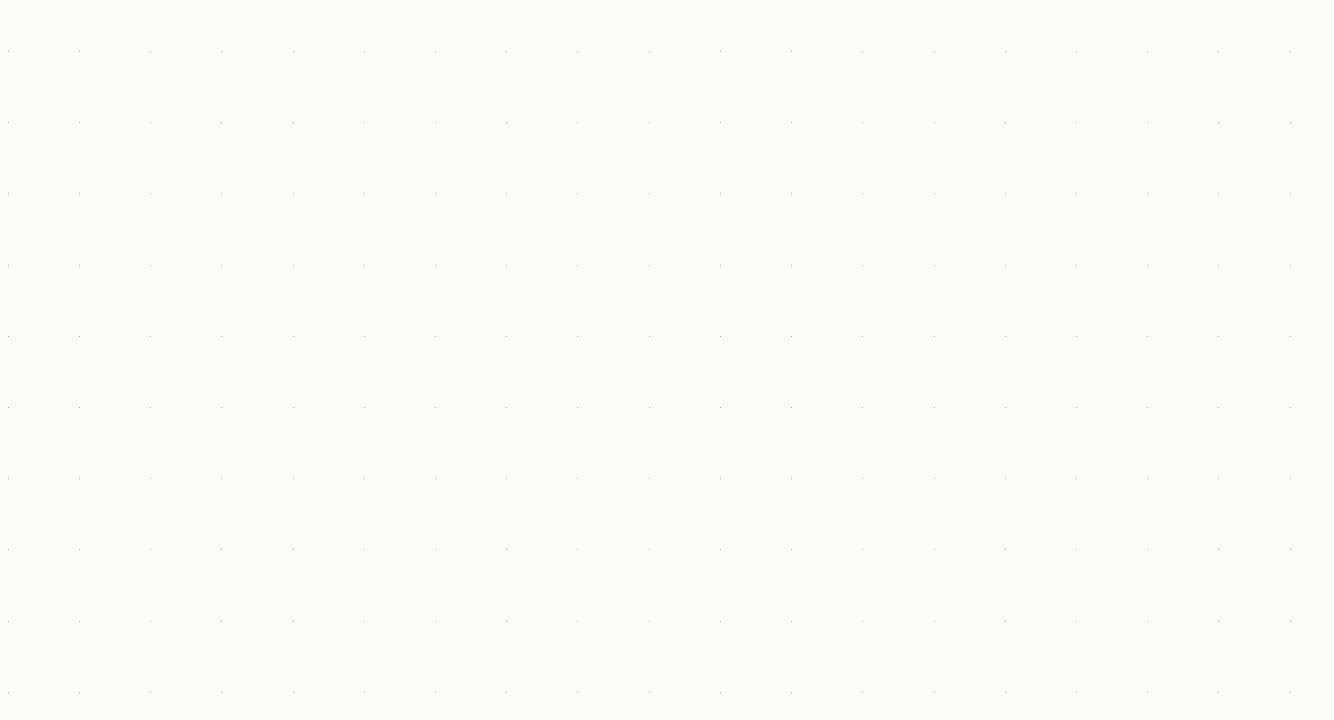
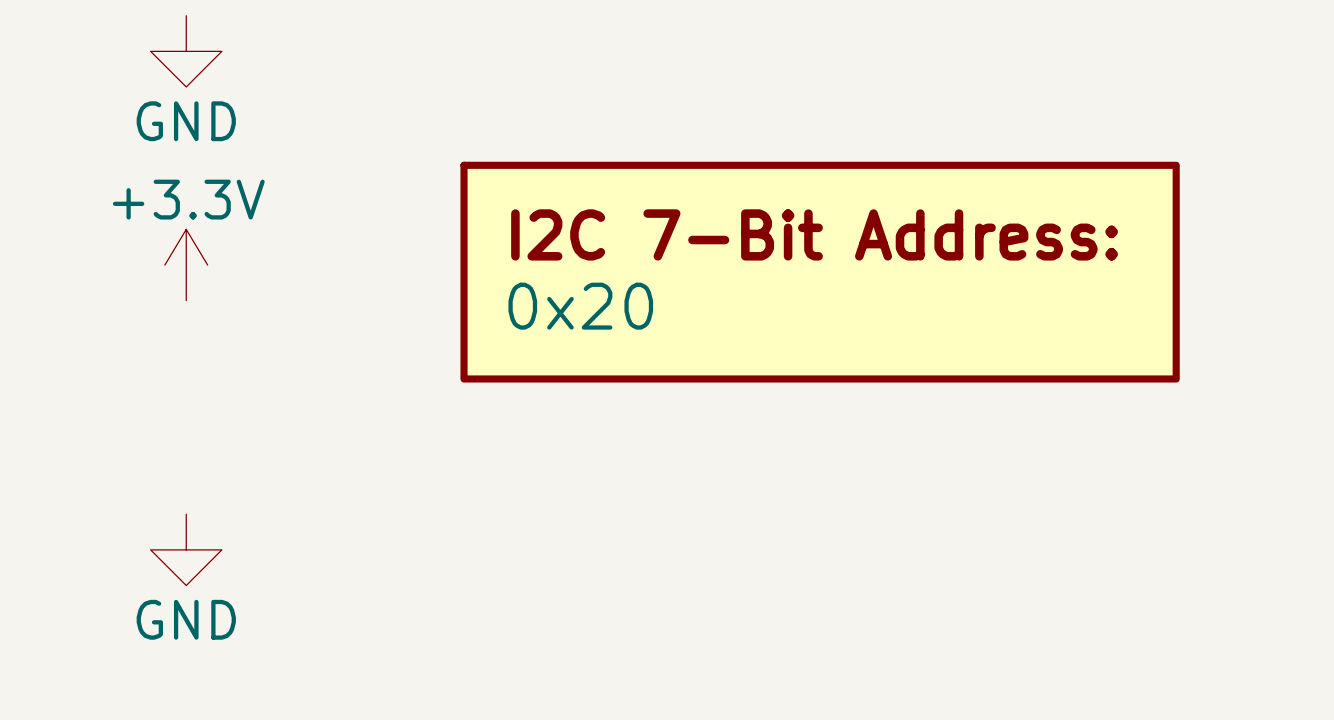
power symbol: none -> GND (186, 51)
power symbol: none -> +3.3V (186, 265)
part: none -> 0x20 (820, 272)
power symbol: none -> GND (186, 549)

